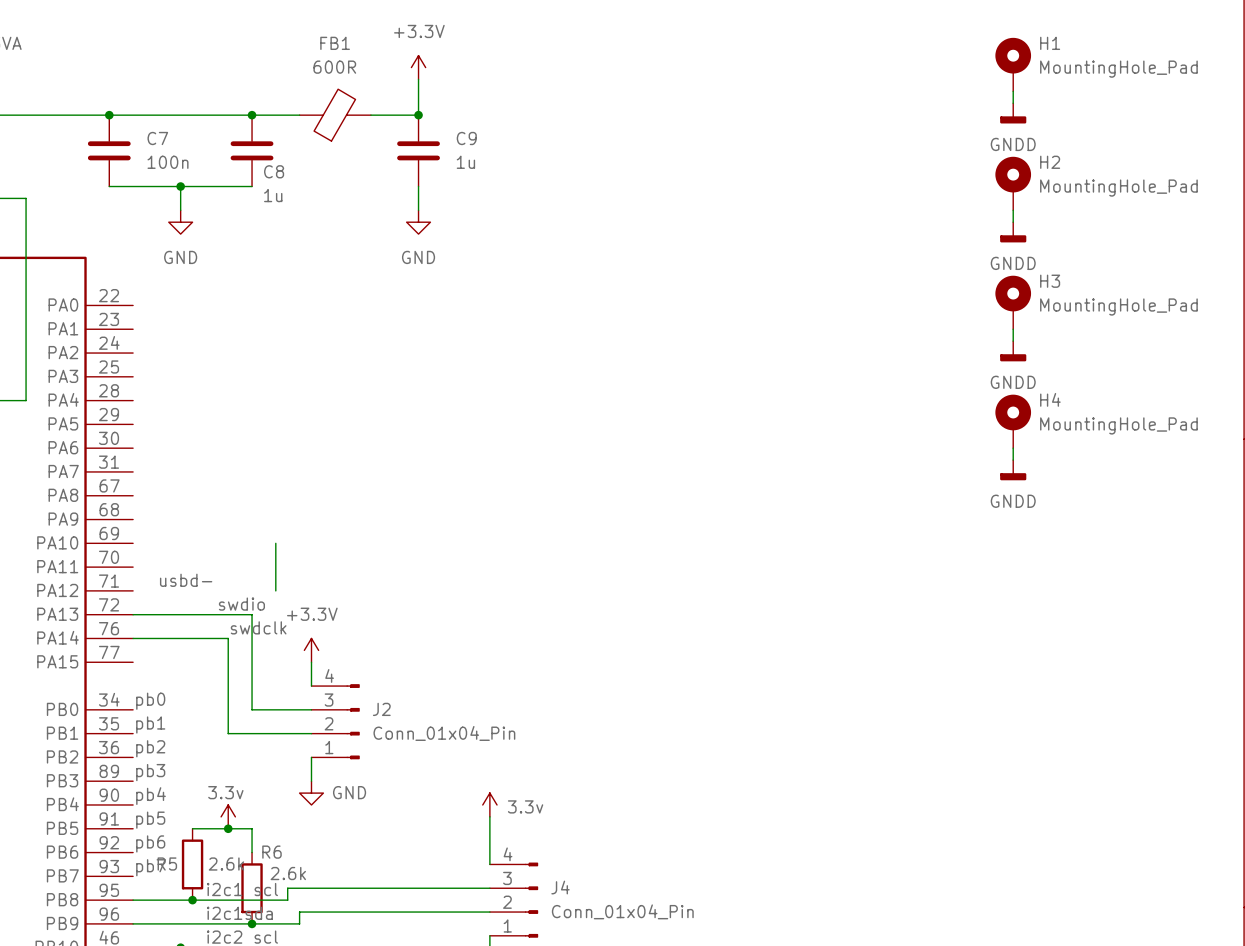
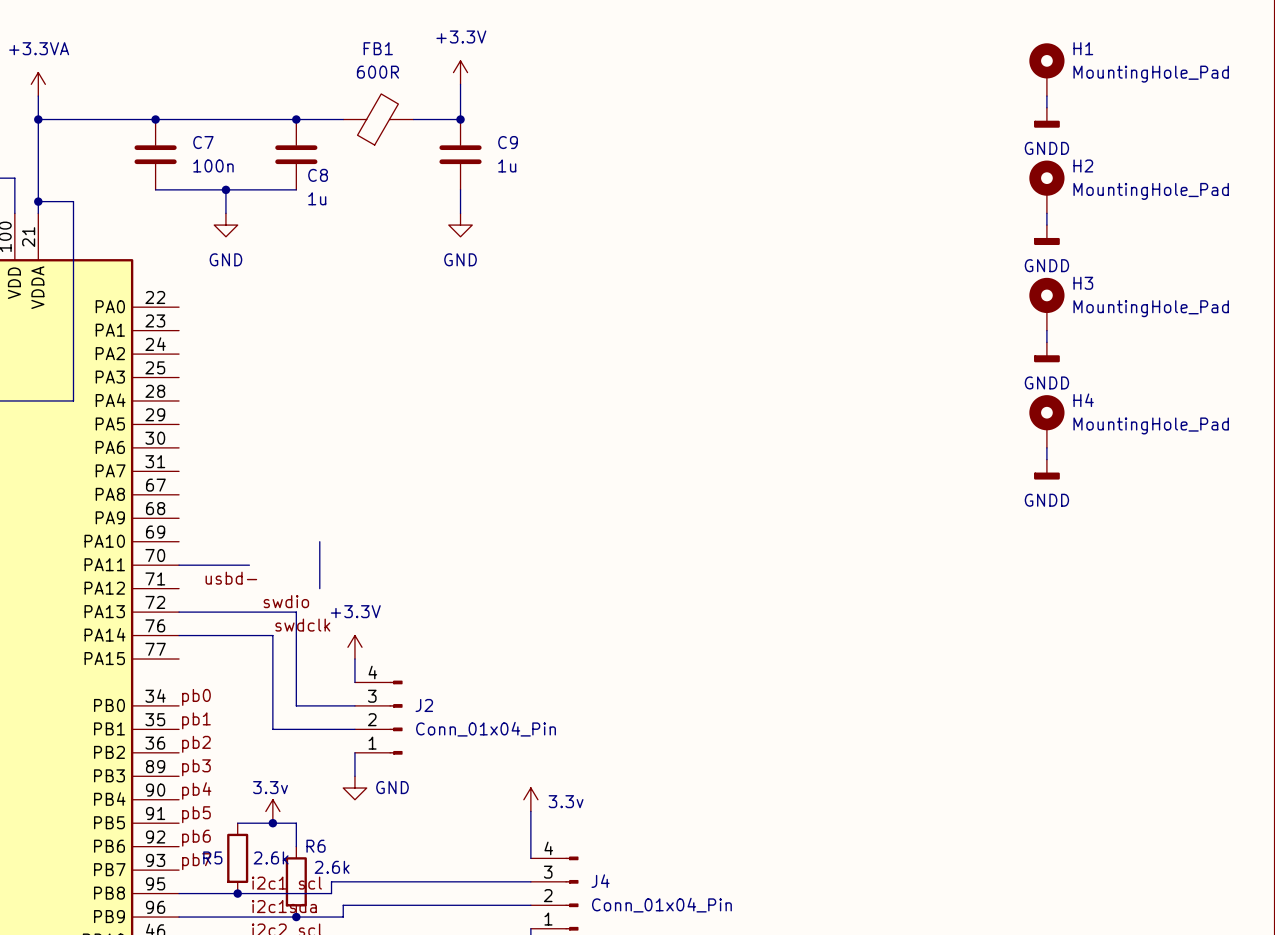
wire: none -> (179, 565) (249, 565)

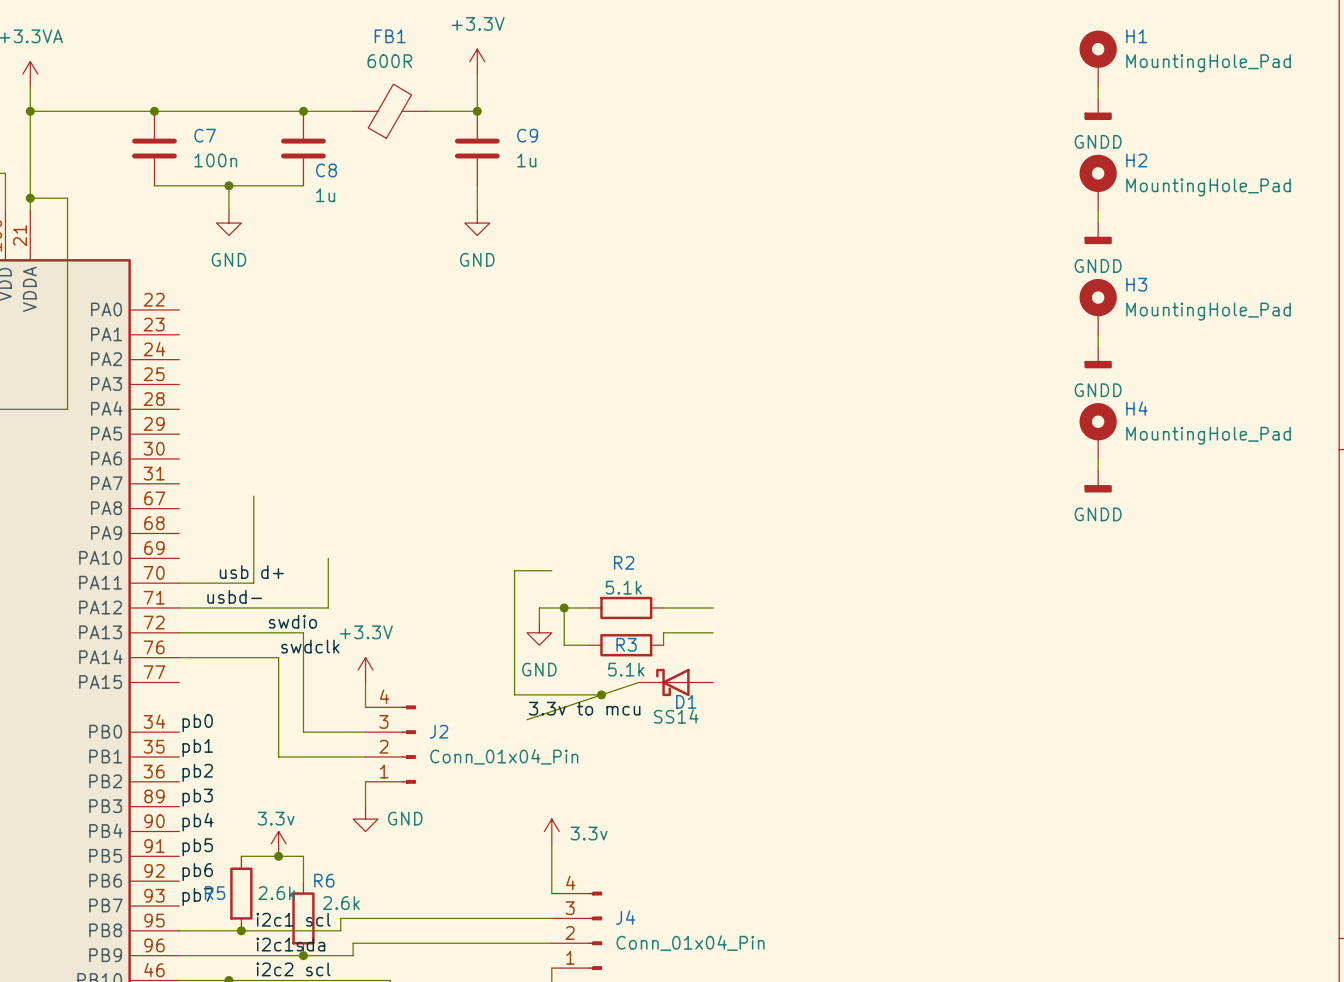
wire: none -> (253, 496) (253, 583)
wire: none -> (551, 570) (514, 570) (514, 694) (601, 694)
label: none -> usb d+ (251, 572)
wire: none -> (179, 607) (328, 607)
wire: none -> (564, 607) (564, 645) (589, 645)
junction: none -> (564, 607)
wire: none -> (589, 607) (539, 607) (539, 620)
R2: none -> 5.1k (626, 607)
wire: none -> (663, 607) (713, 607)
power symbol: none -> GND (539, 632)
wire: none -> (713, 632) (663, 632) (663, 645)
R3: none -> 5.1k (626, 645)
wire: none -> (638, 682) (526, 719)
D1: none -> SS14 (675, 682)
junction: none -> (601, 694)
label: none -> 3.3v to mcu (584, 708)

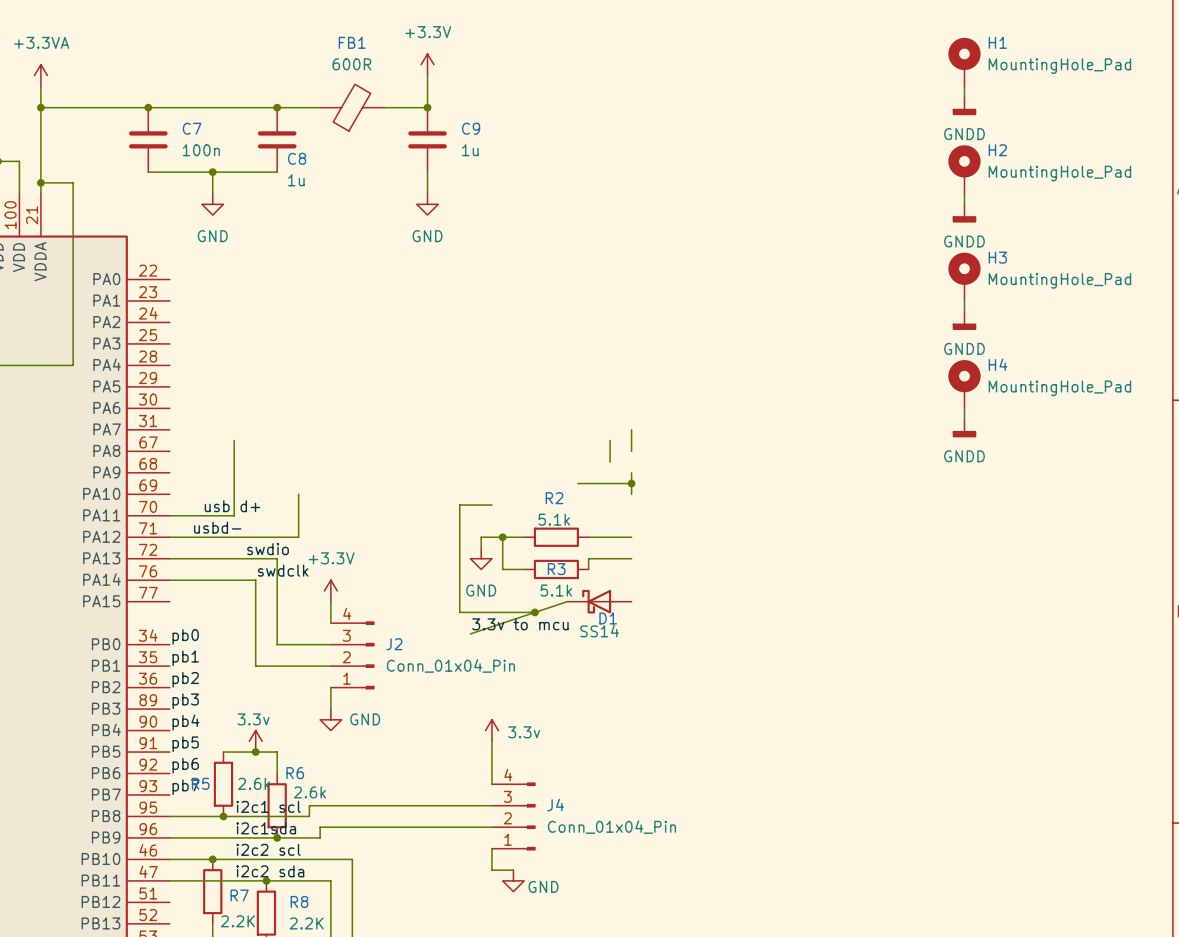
wire: none -> (631, 429) (631, 451)
wire: none -> (610, 440) (610, 462)
wire: none -> (631, 472) (631, 494)
wire: none -> (577, 483) (631, 483)
junction: none -> (631, 483)

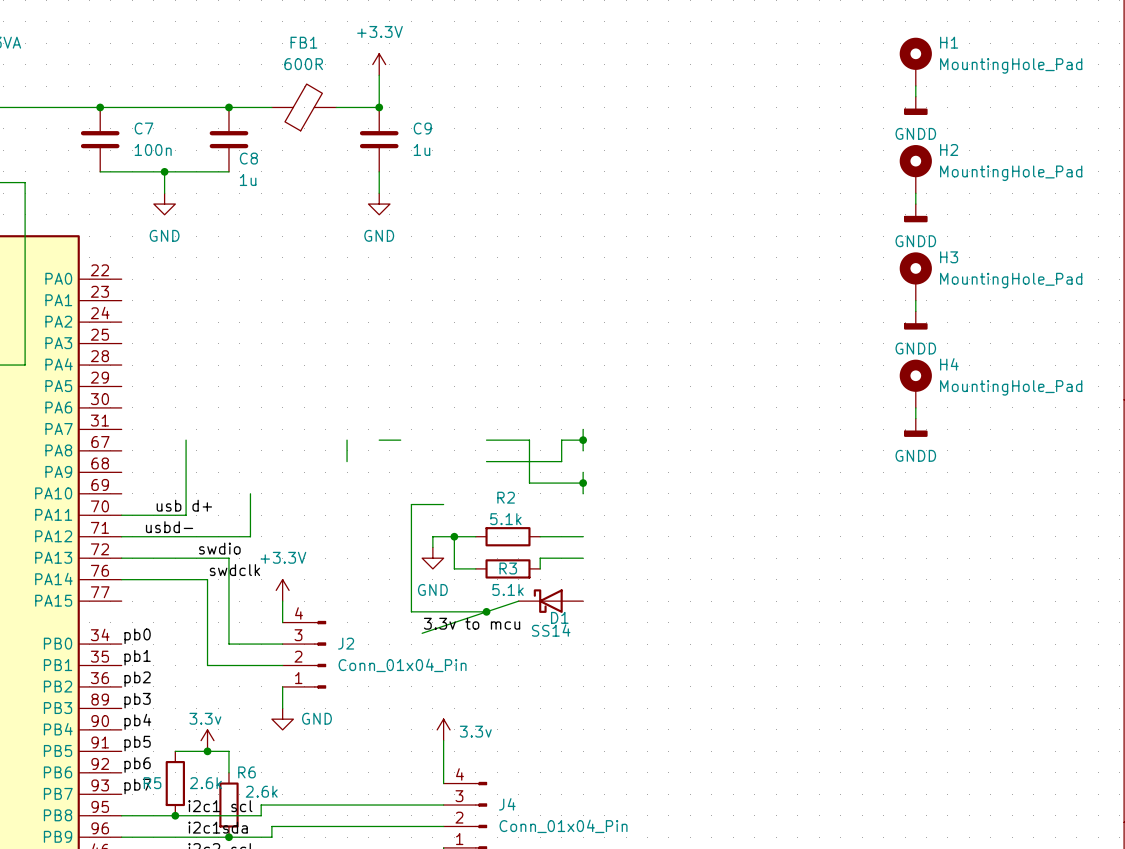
wire: none -> (347, 440) (347, 461)
wire: none -> (379, 440) (400, 440)
wire: none -> (486, 440) (529, 440) (529, 483)
wire: none -> (561, 440) (583, 440)
junction: none -> (583, 440)
wire: none -> (486, 461) (561, 461)

